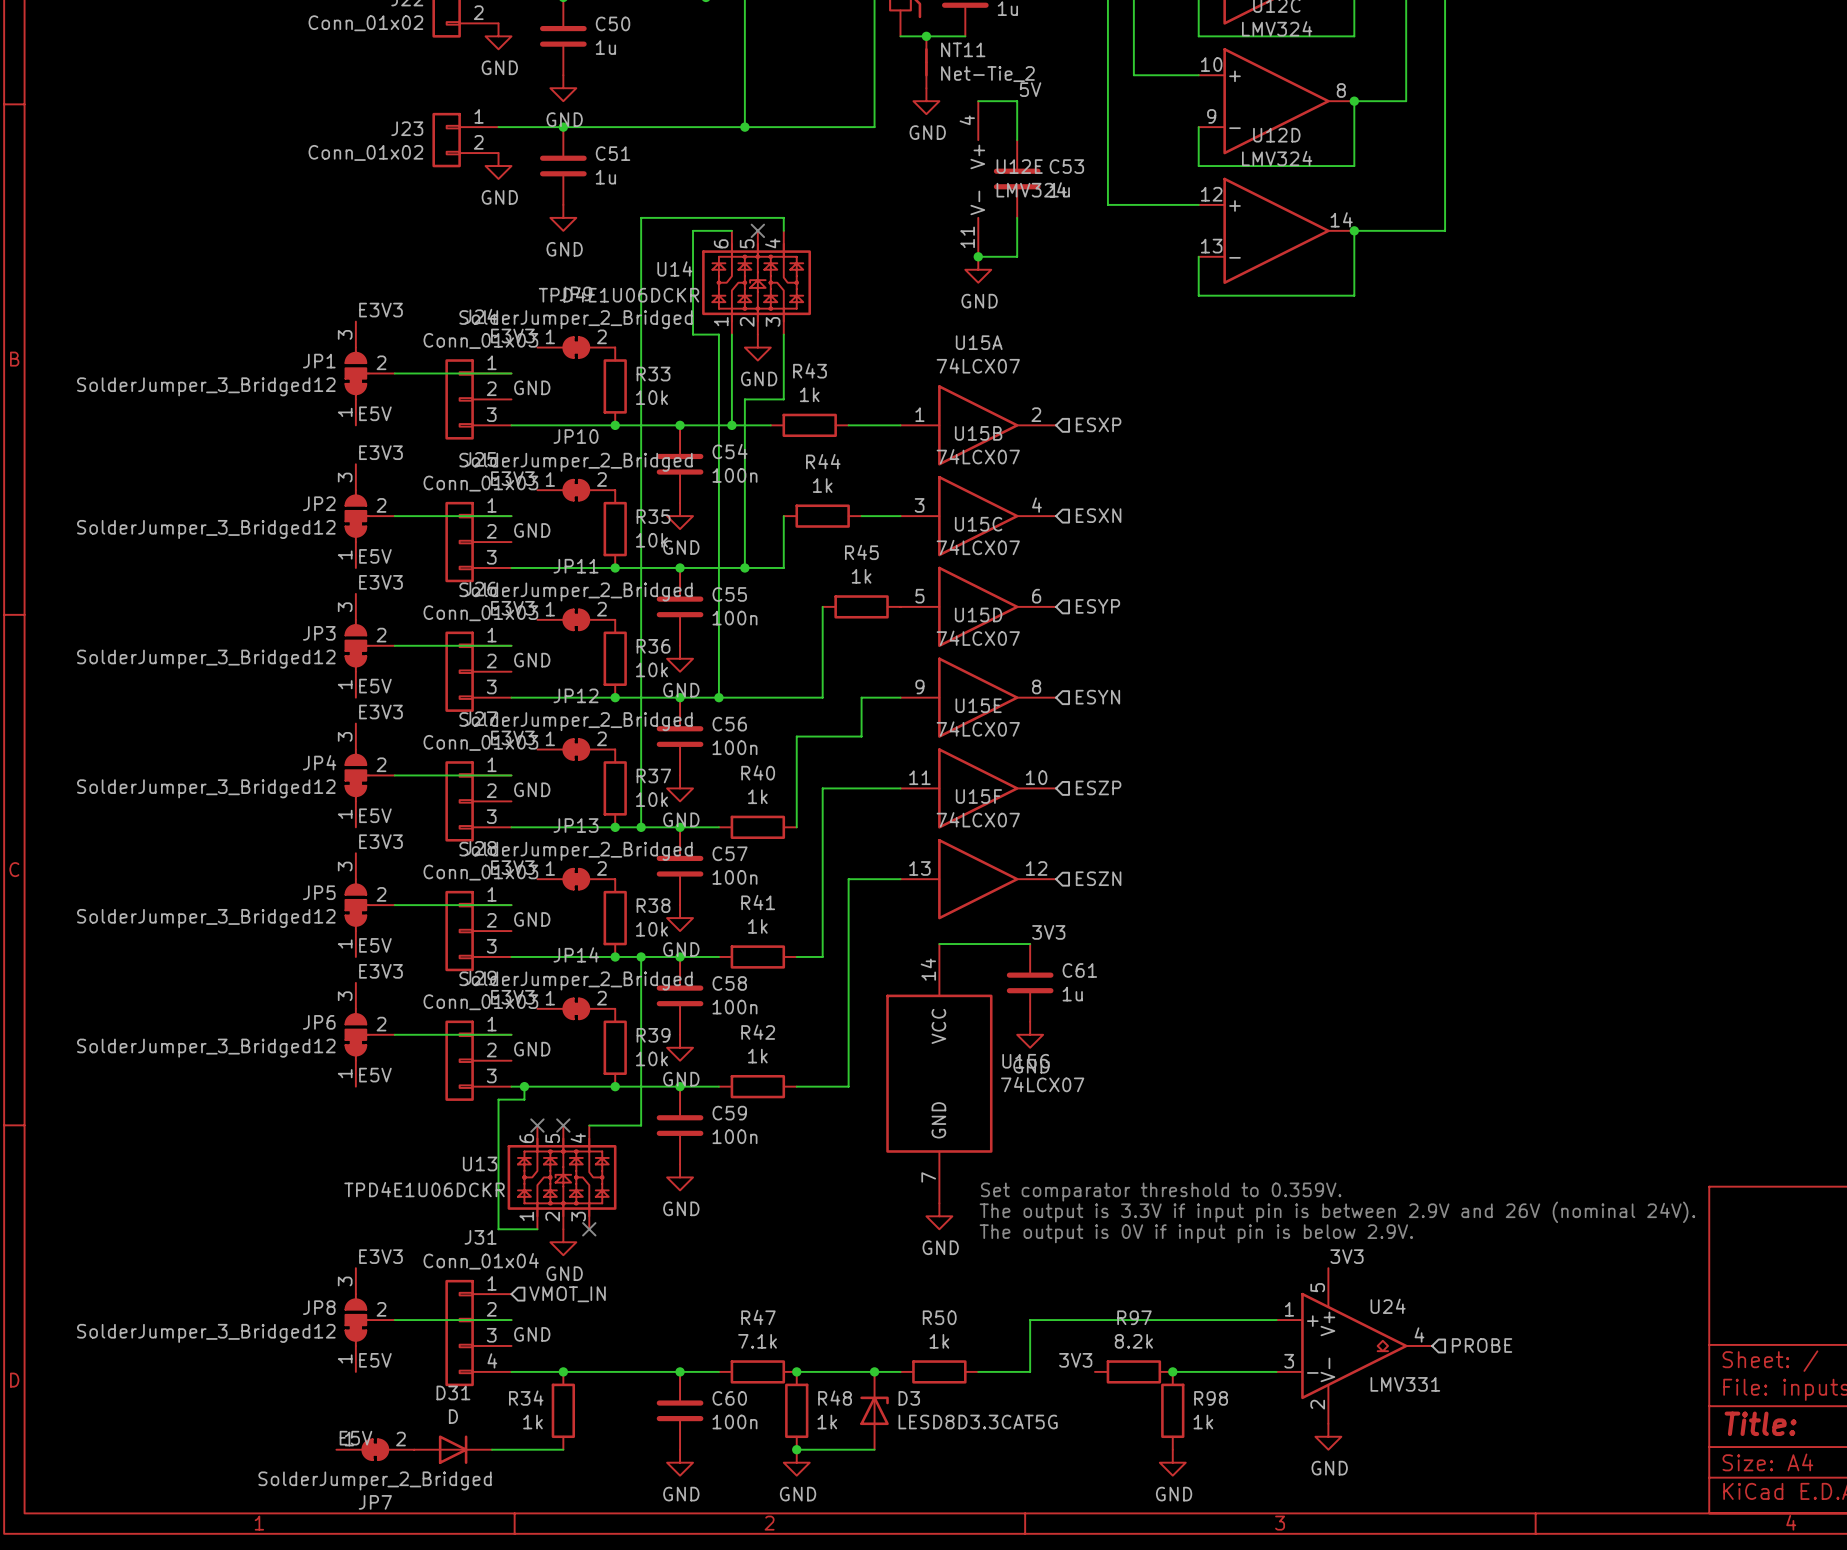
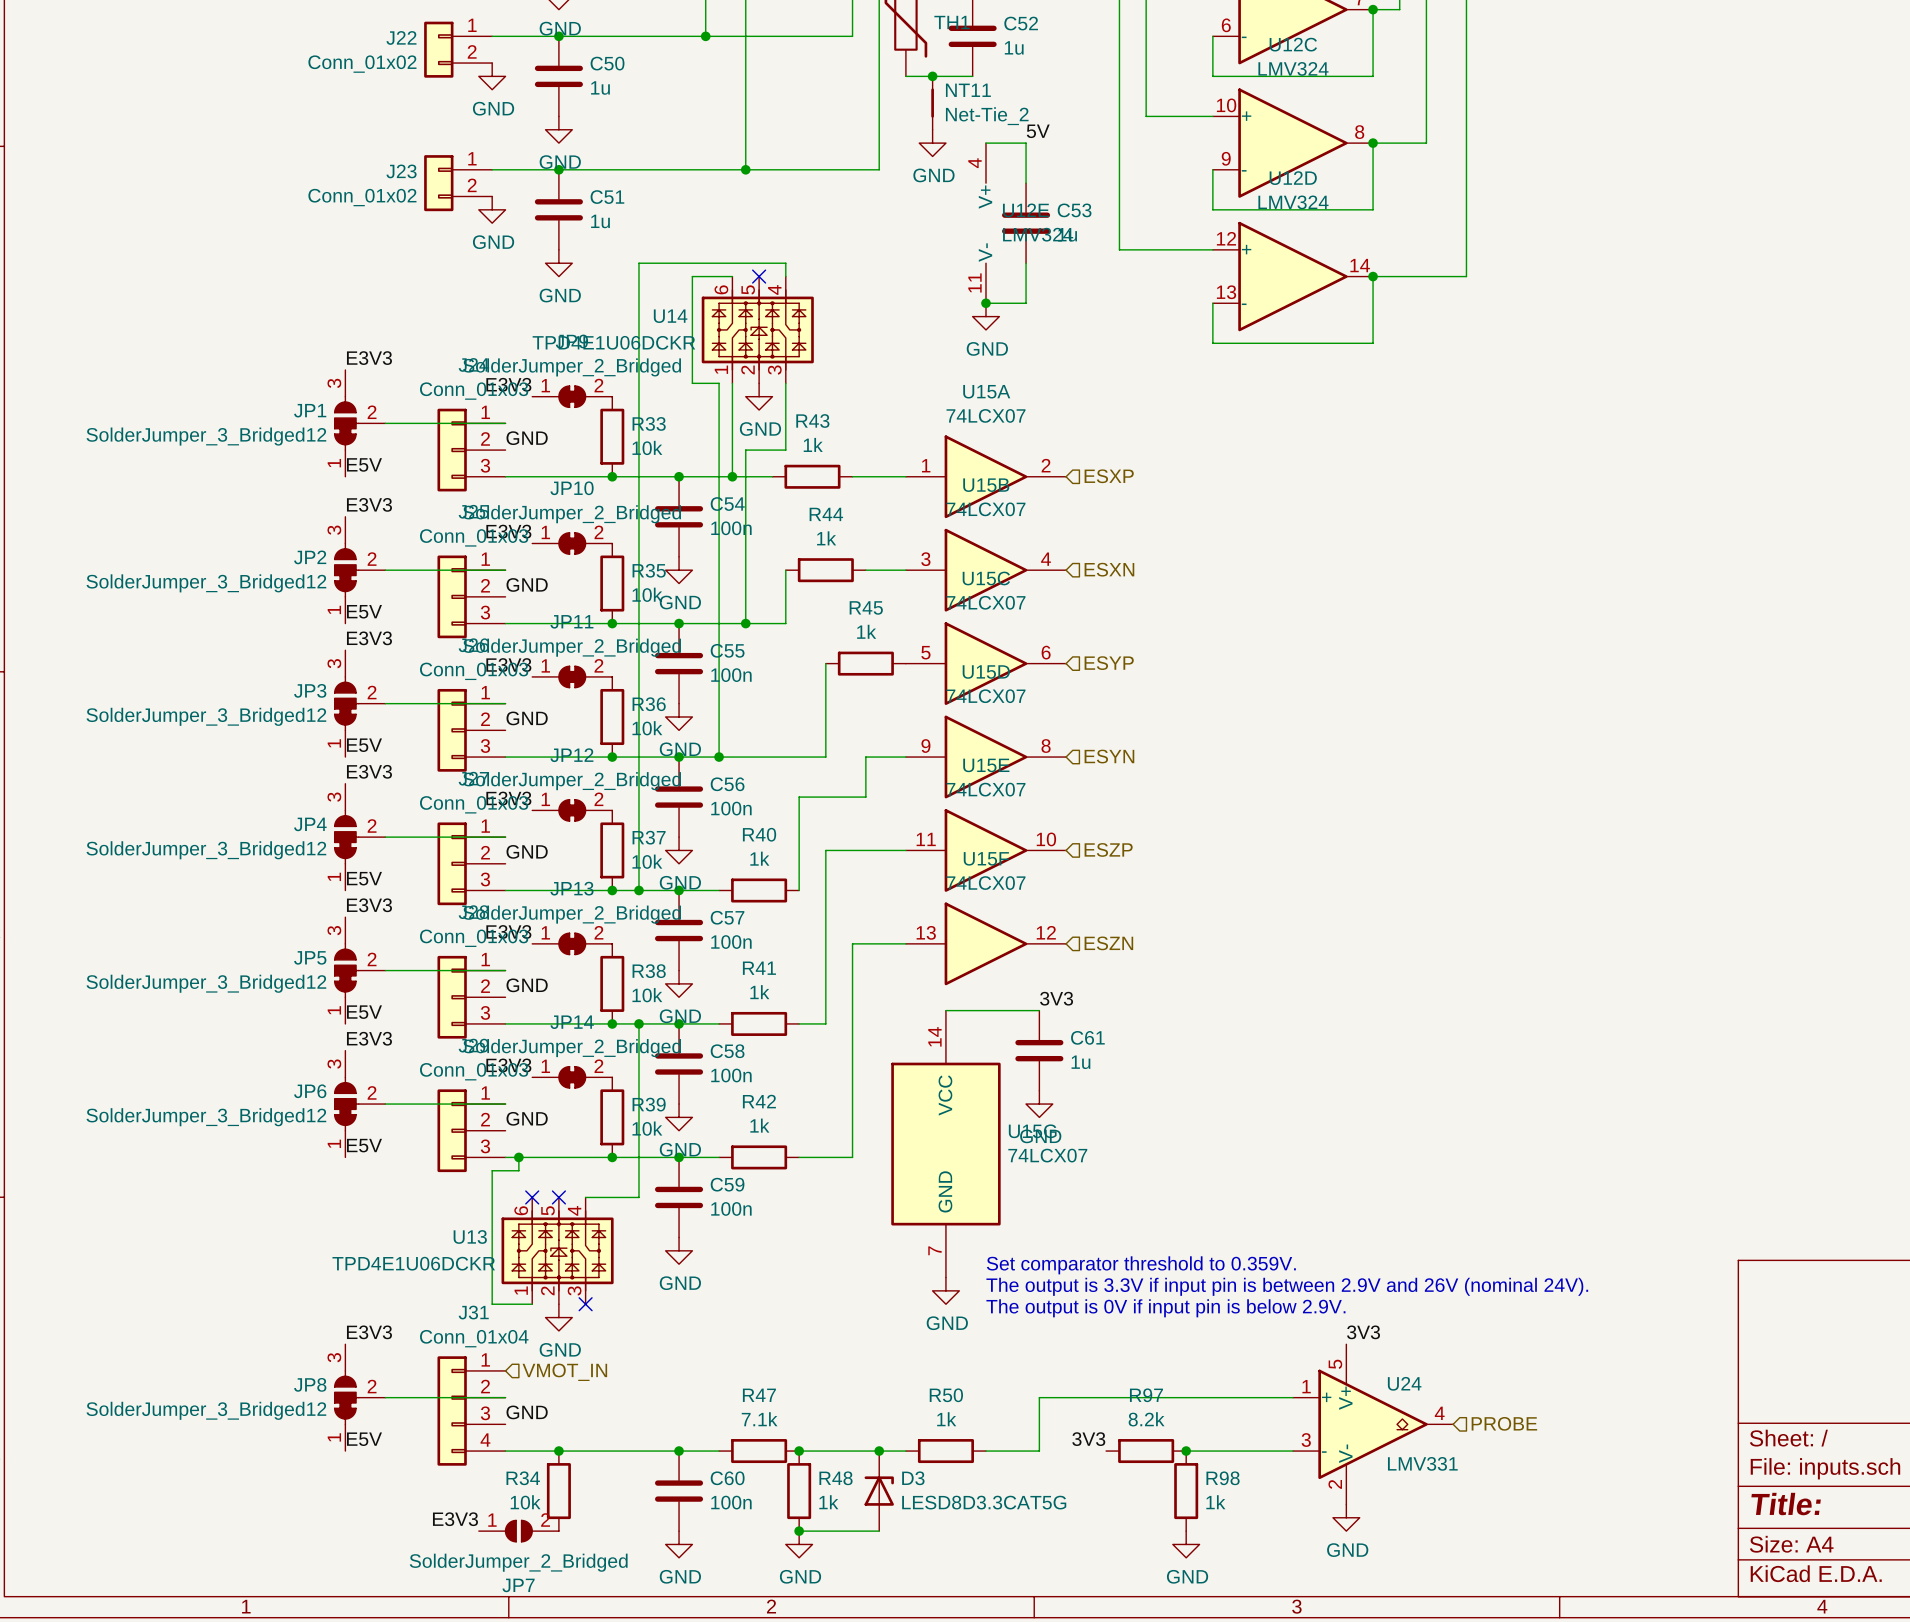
R34 value: 1k (533, 1422) -> 10k (525, 1502)
label: E5V (355, 1438) -> none
label: none -> E3V3 (455, 1519)
JP7 symbol: [336, 1439, 415, 1461] -> [478, 1520, 559, 1542]
D31: D (453, 1449) -> none

